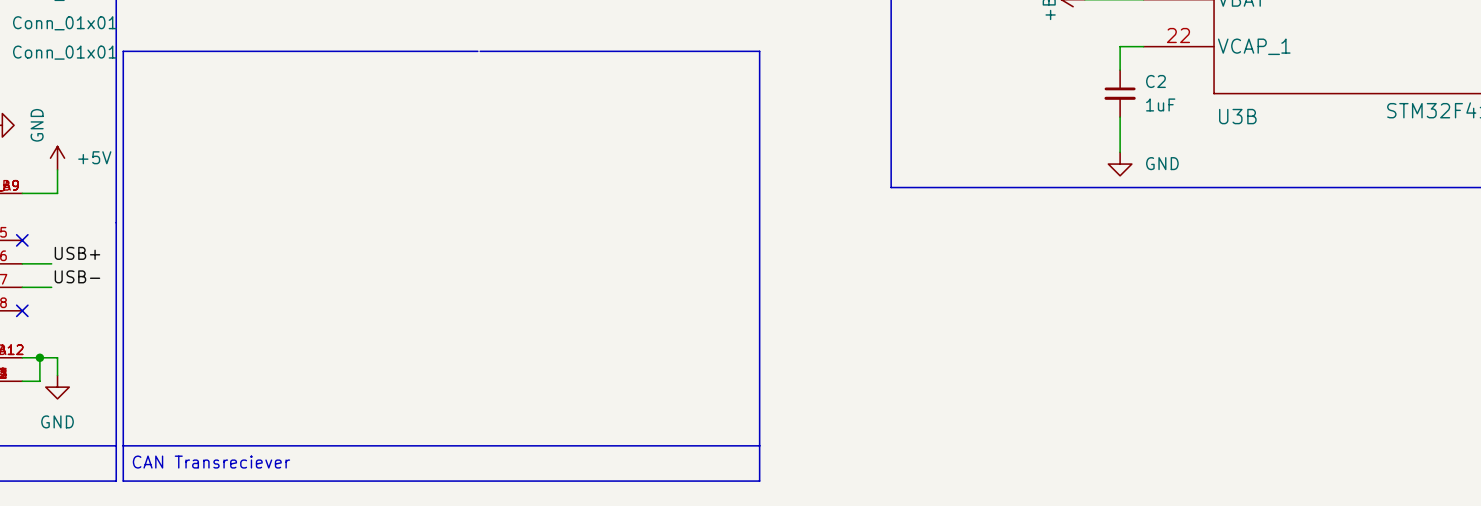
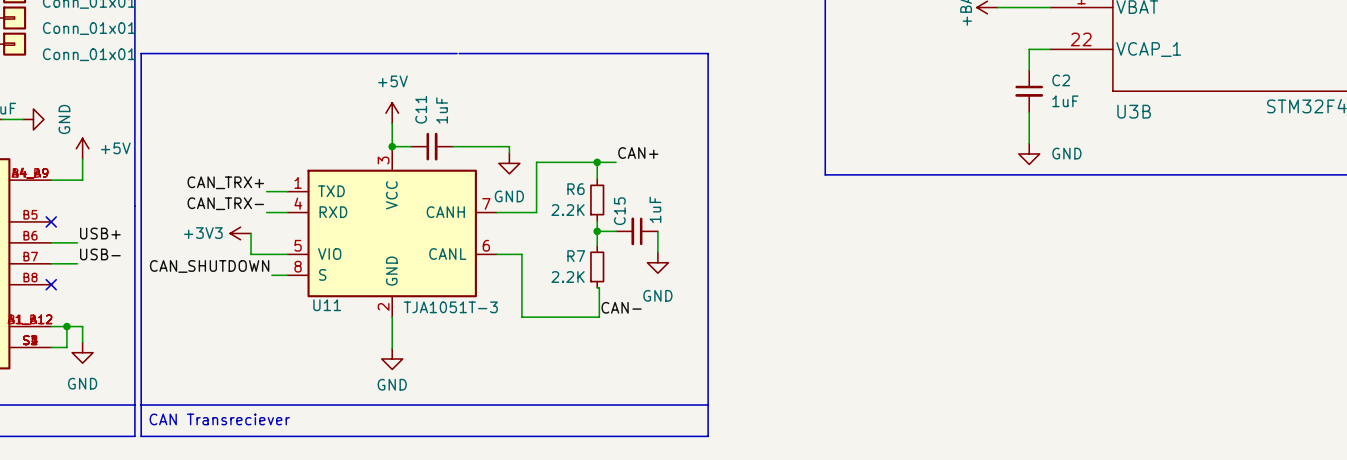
power symbol: none -> +5V (392, 113)
wire: none -> (392, 123) (392, 149)
wire: none -> (392, 146) (411, 146)
junction: none -> (392, 146)
C11: none -> 1uF (431, 146)
wire: none -> (452, 146) (509, 146) (509, 152)
label: none -> CAN+ (638, 153)
wire: none -> (597, 162) (597, 179)
junction: none -> (597, 162)
wire: none -> (616, 162) (536, 162) (536, 212) (496, 212)
power symbol: none -> GND (509, 163)
label: none -> CAN_TRX+ (225, 182)
wire: none -> (266, 191) (287, 191)
R6: none -> 2.2K (597, 200)
label: none -> CAN_TRX- (225, 203)
wire: none -> (266, 212) (287, 212)
wire: none -> (597, 220) (597, 246)
wire: none -> (597, 231) (616, 231)
junction: none -> (597, 231)
C15: none -> 1uF (636, 231)
wire: none -> (657, 231) (657, 252)
power symbol: none -> +3V3 (240, 233)
wire: none -> (251, 233) (251, 254) (287, 254)
U11: none -> TJA1051T-3 (392, 233)
wire: none -> (496, 254) (521, 254) (521, 317) (599, 317) (599, 287) (597, 287)
power symbol: none -> GND (657, 262)
label: none -> CAN_SHUTDOWN (209, 266)
R7: none -> 2.2K (597, 266)
wire: none -> (271, 275) (287, 275)
label: none -> CAN- (621, 307)
wire: none -> (392, 317) (392, 348)
power symbol: none -> GND (392, 358)

